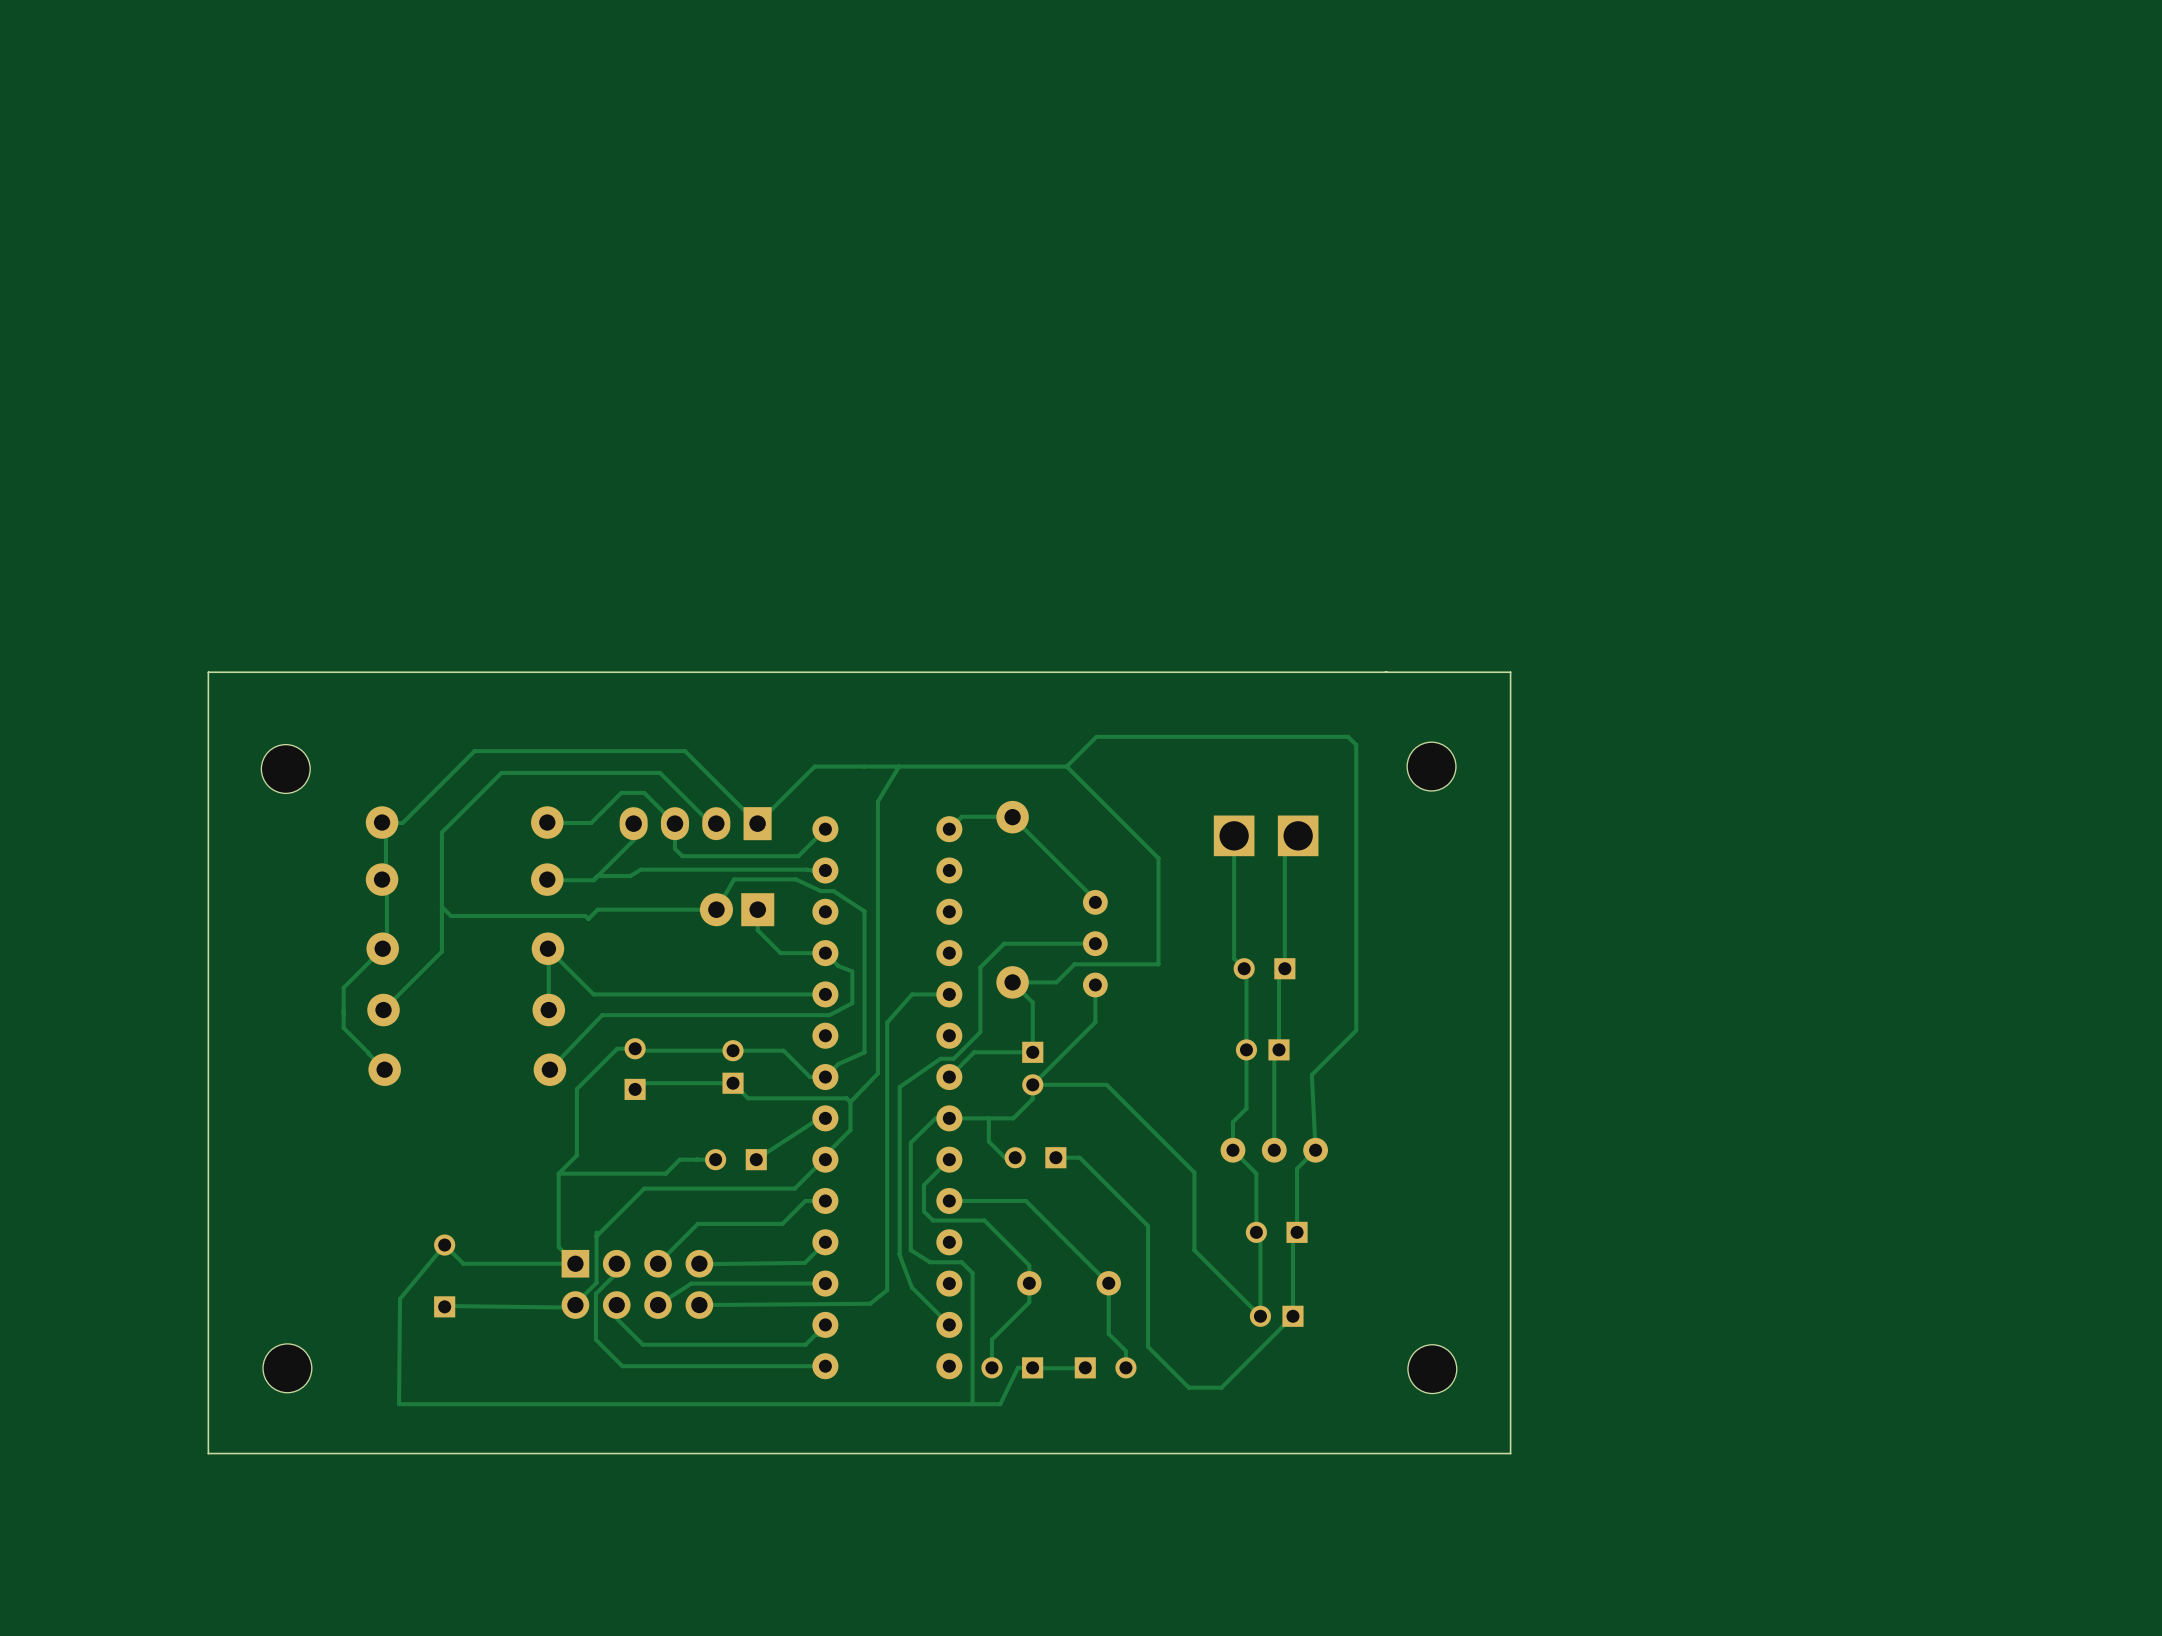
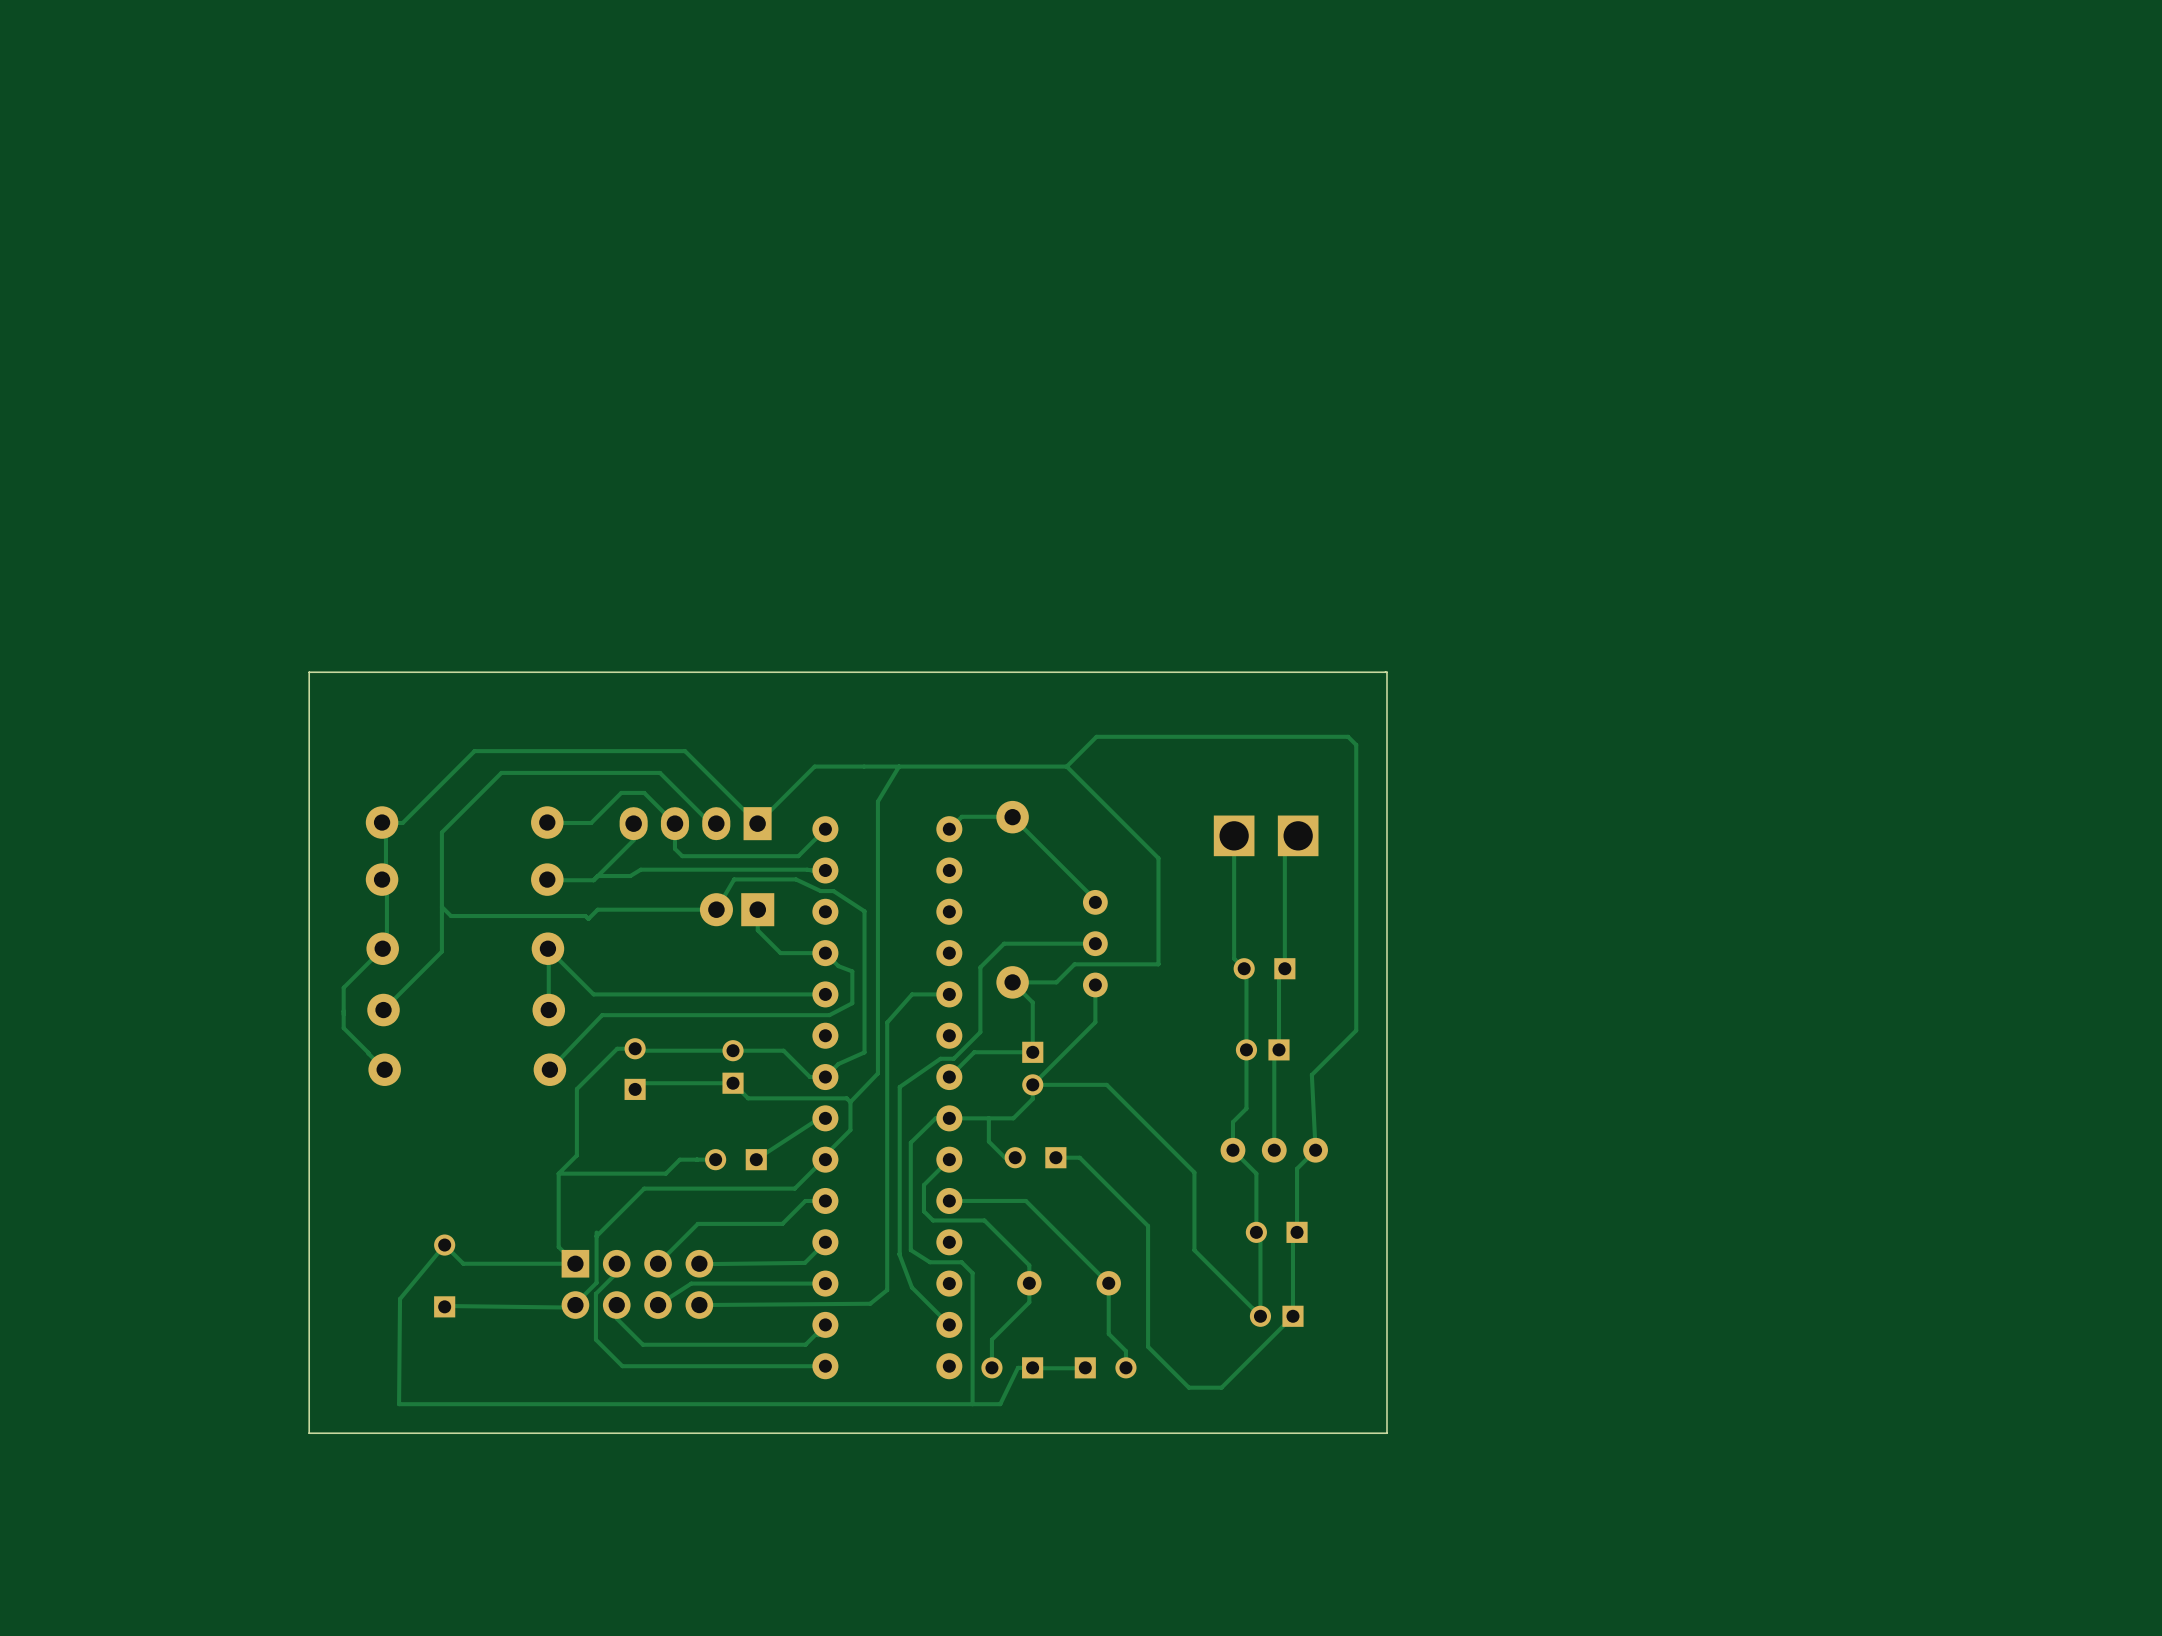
board edge: (1386, 672) (1510, 672) (1510, 1453) (208, 1453) (208, 672) (309, 672) -> (1386, 672) (1386, 1433) (309, 1433) (309, 672)
part: (1431, 766) -> none
part: (285, 769) -> none
part: (287, 1368) -> none
part: (1432, 1369) -> none

